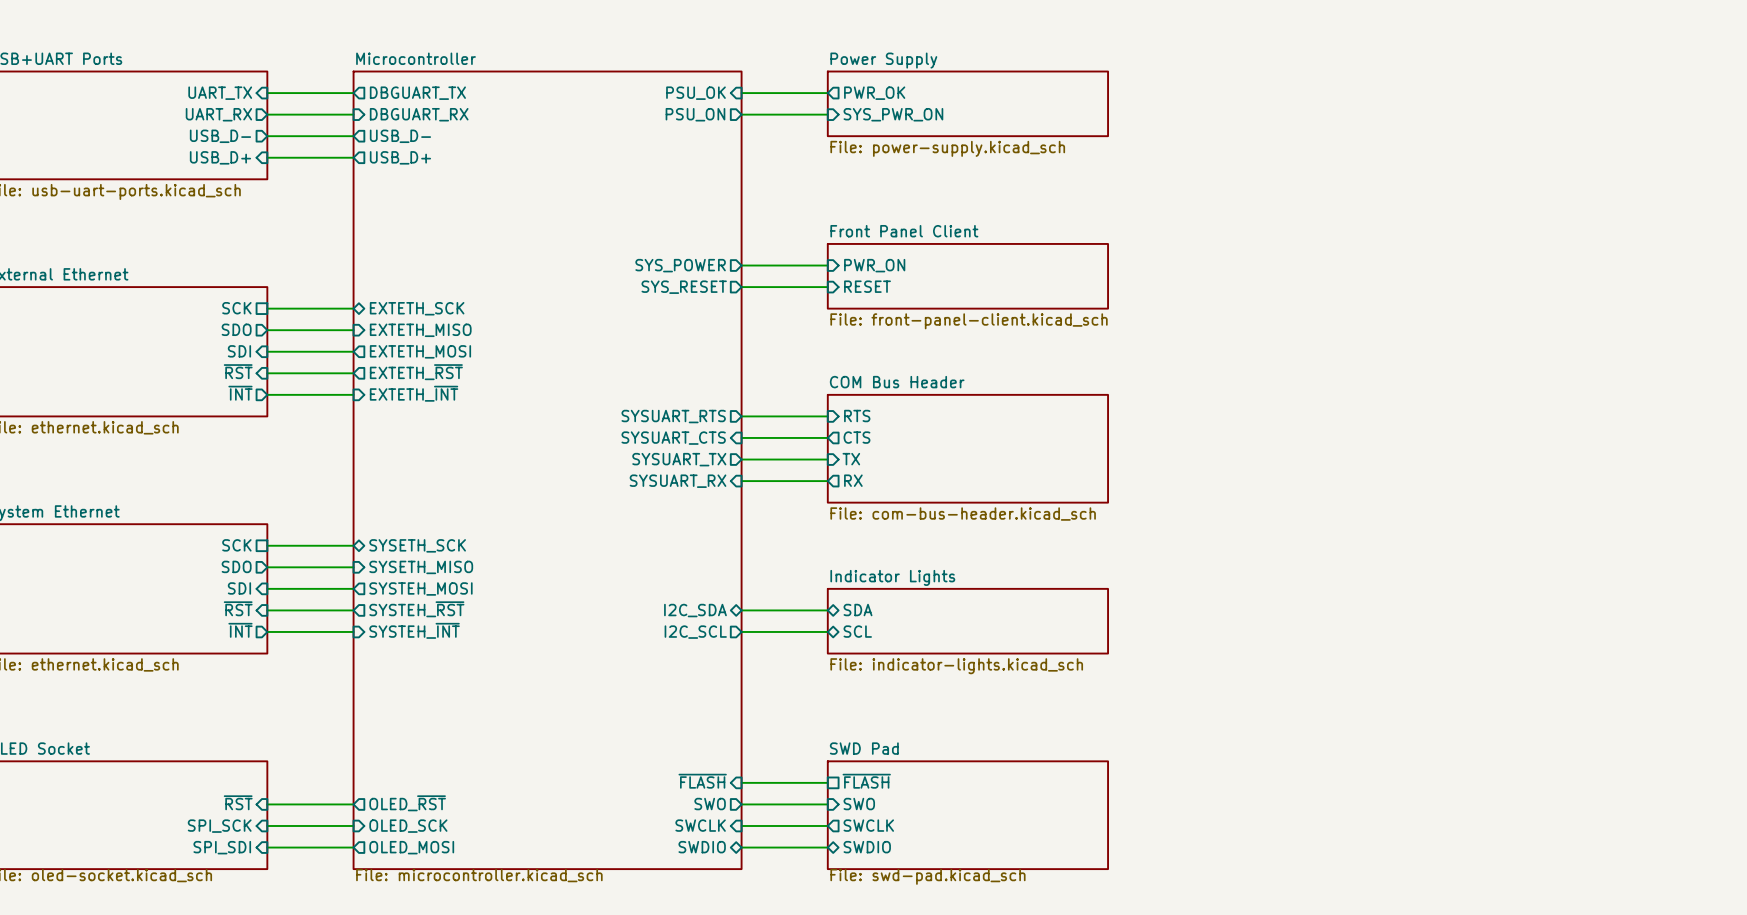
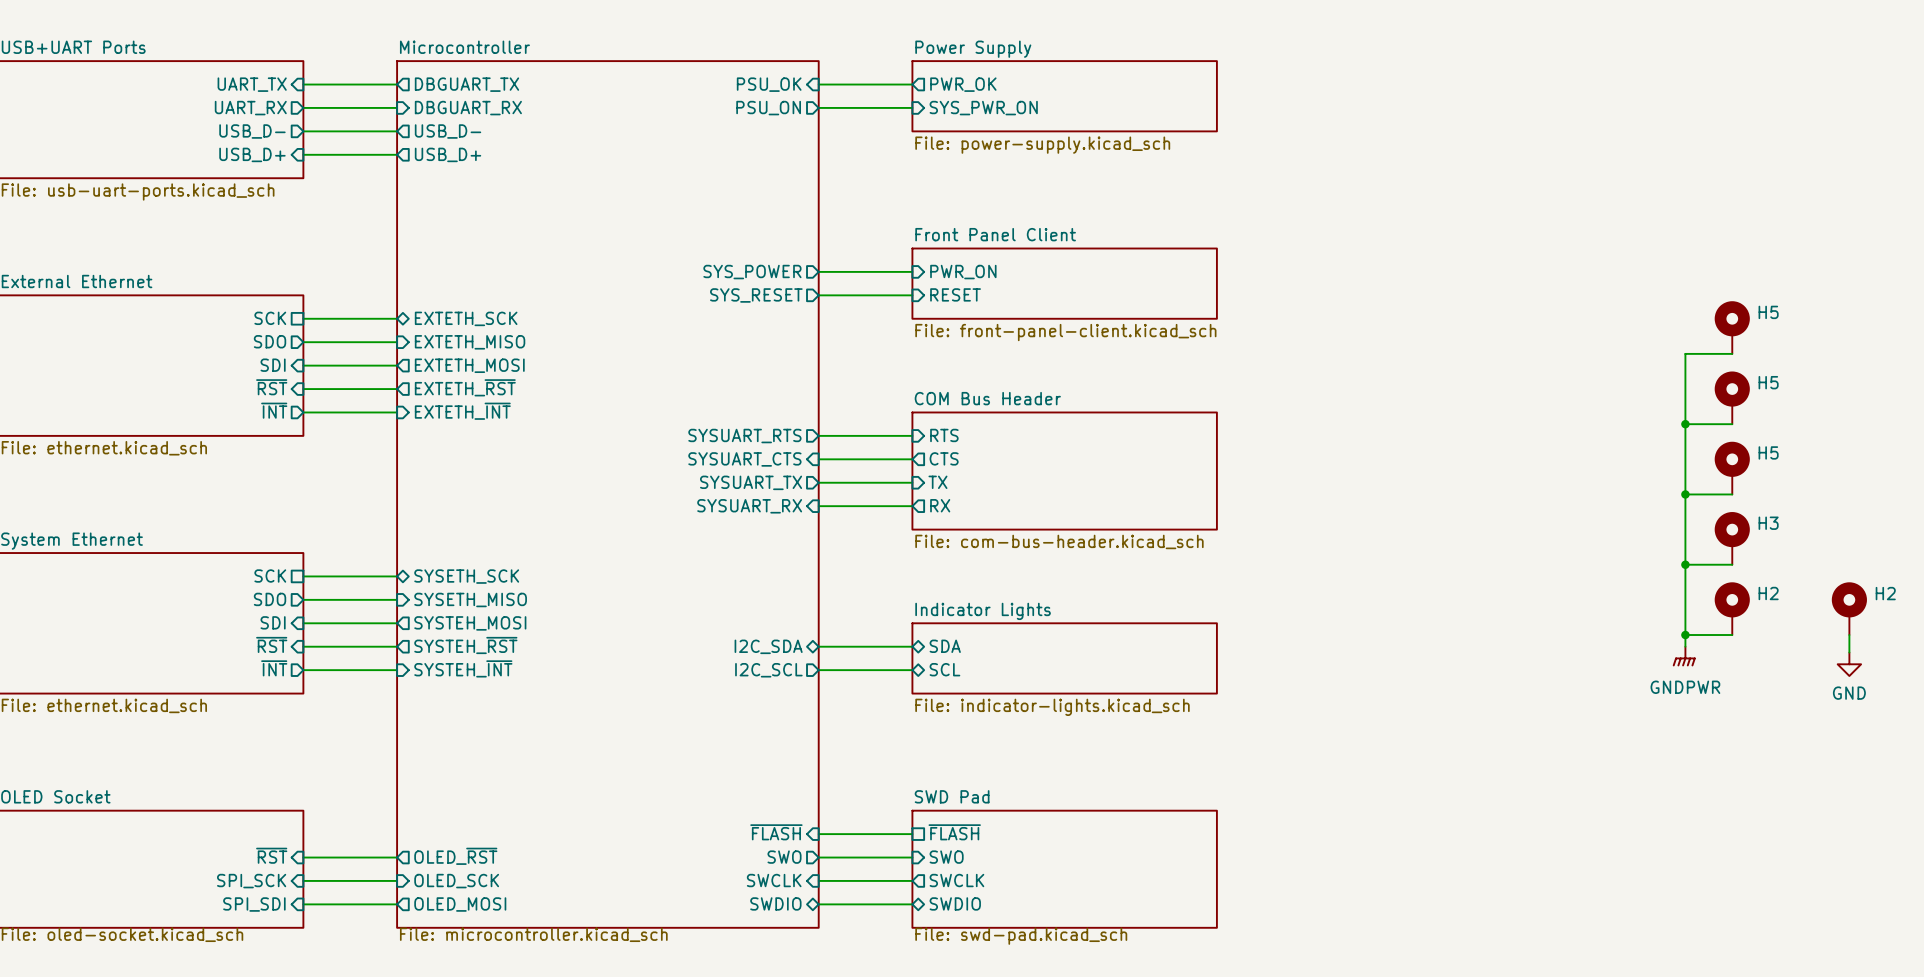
H5: none -> (1732, 327)
wire: none -> (1732, 353) (1685, 353) (1685, 646)
H5: none -> (1732, 397)
wire: none -> (1685, 424) (1732, 424)
junction: none -> (1685, 424)
H5: none -> (1732, 468)
wire: none -> (1685, 494) (1732, 494)
junction: none -> (1685, 494)
H3: none -> (1732, 538)
wire: none -> (1685, 564) (1732, 564)
junction: none -> (1685, 564)
H2: none -> (1732, 608)
H2: none -> (1849, 608)
wire: none -> (1685, 635) (1732, 635)
junction: none -> (1685, 635)
wire: none -> (1849, 635) (1849, 652)
power symbol: none -> GNDPWR (1684, 656)
power symbol: none -> GND (1849, 664)

